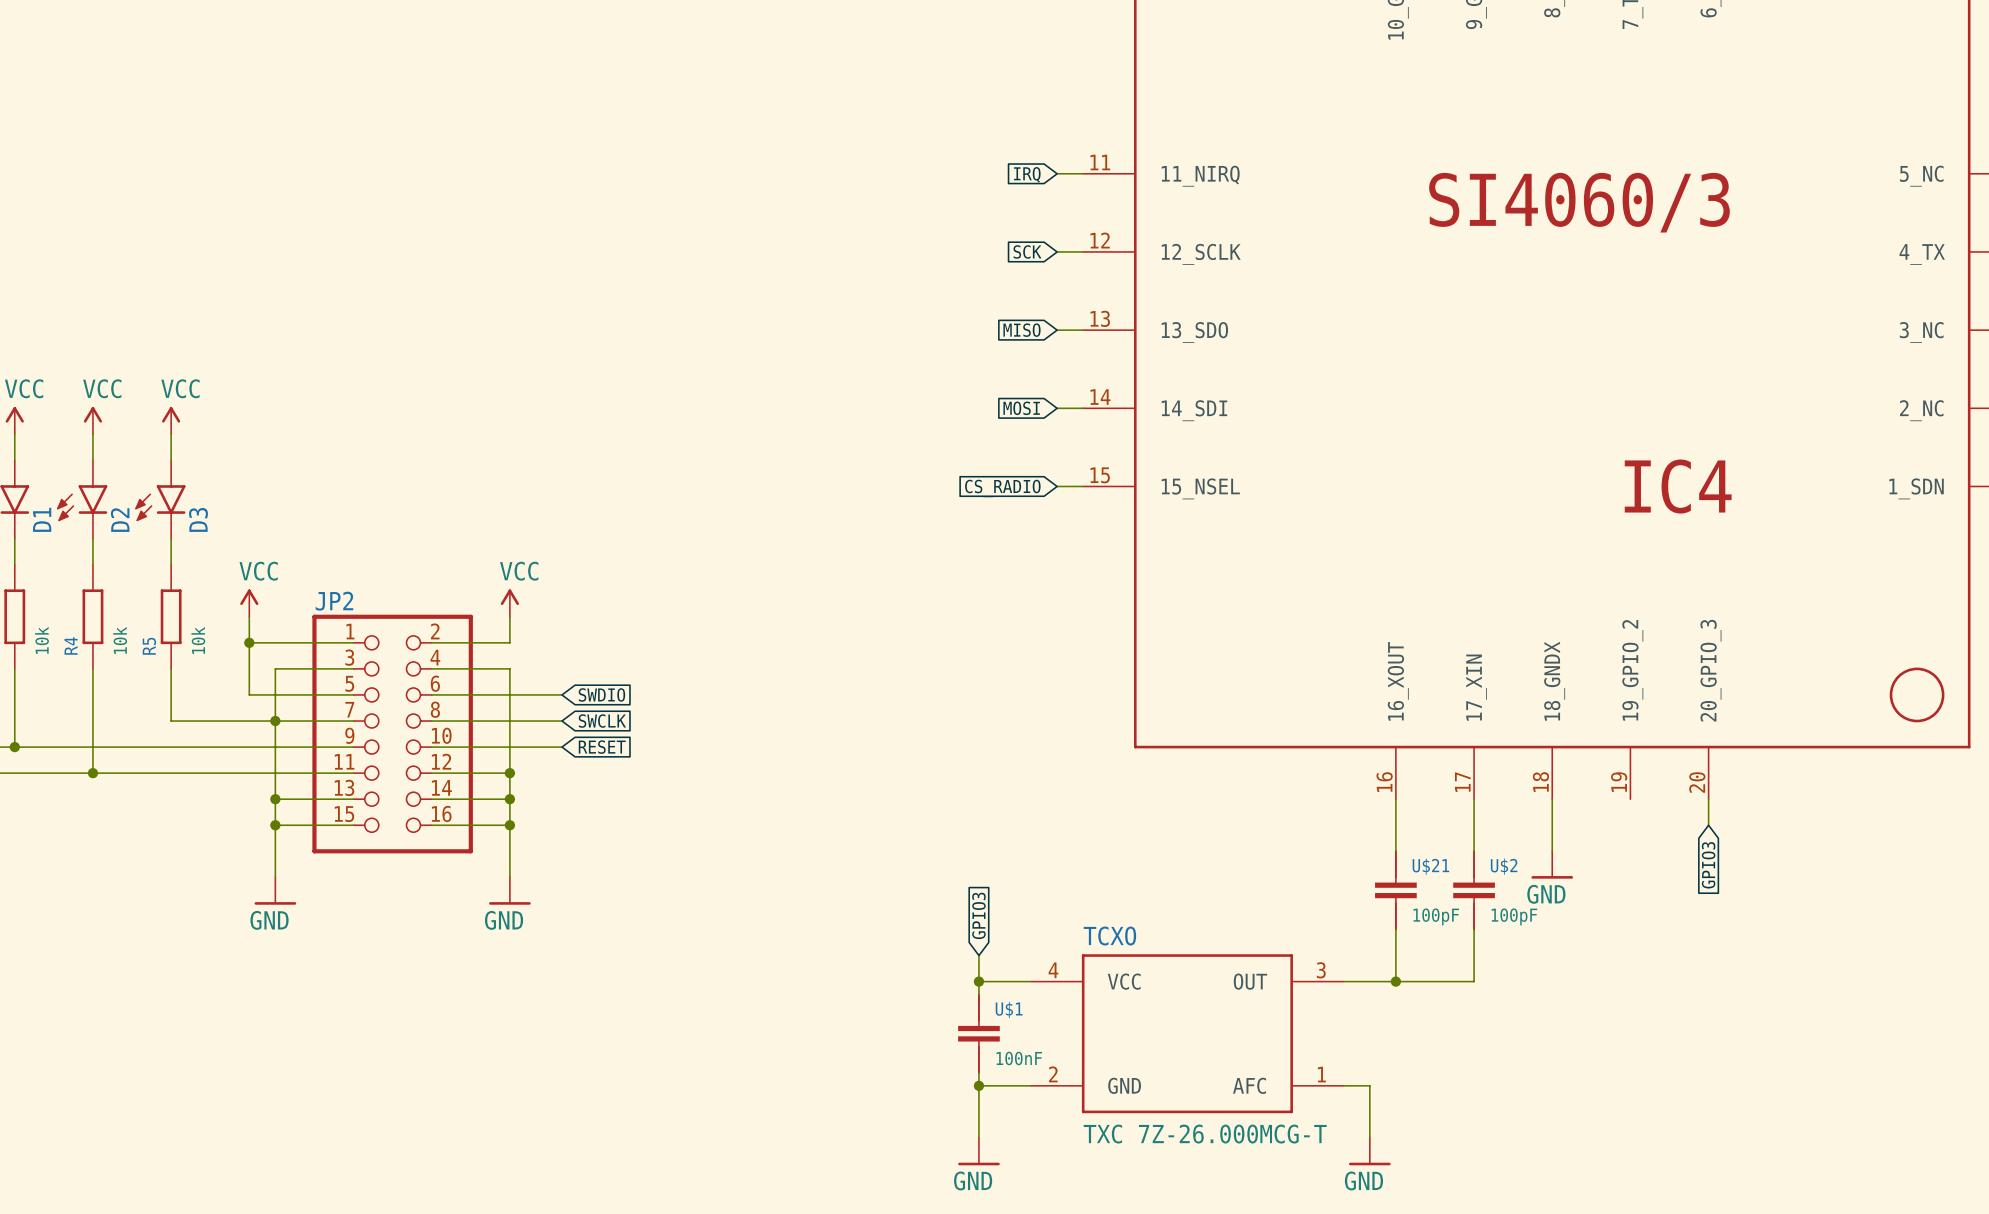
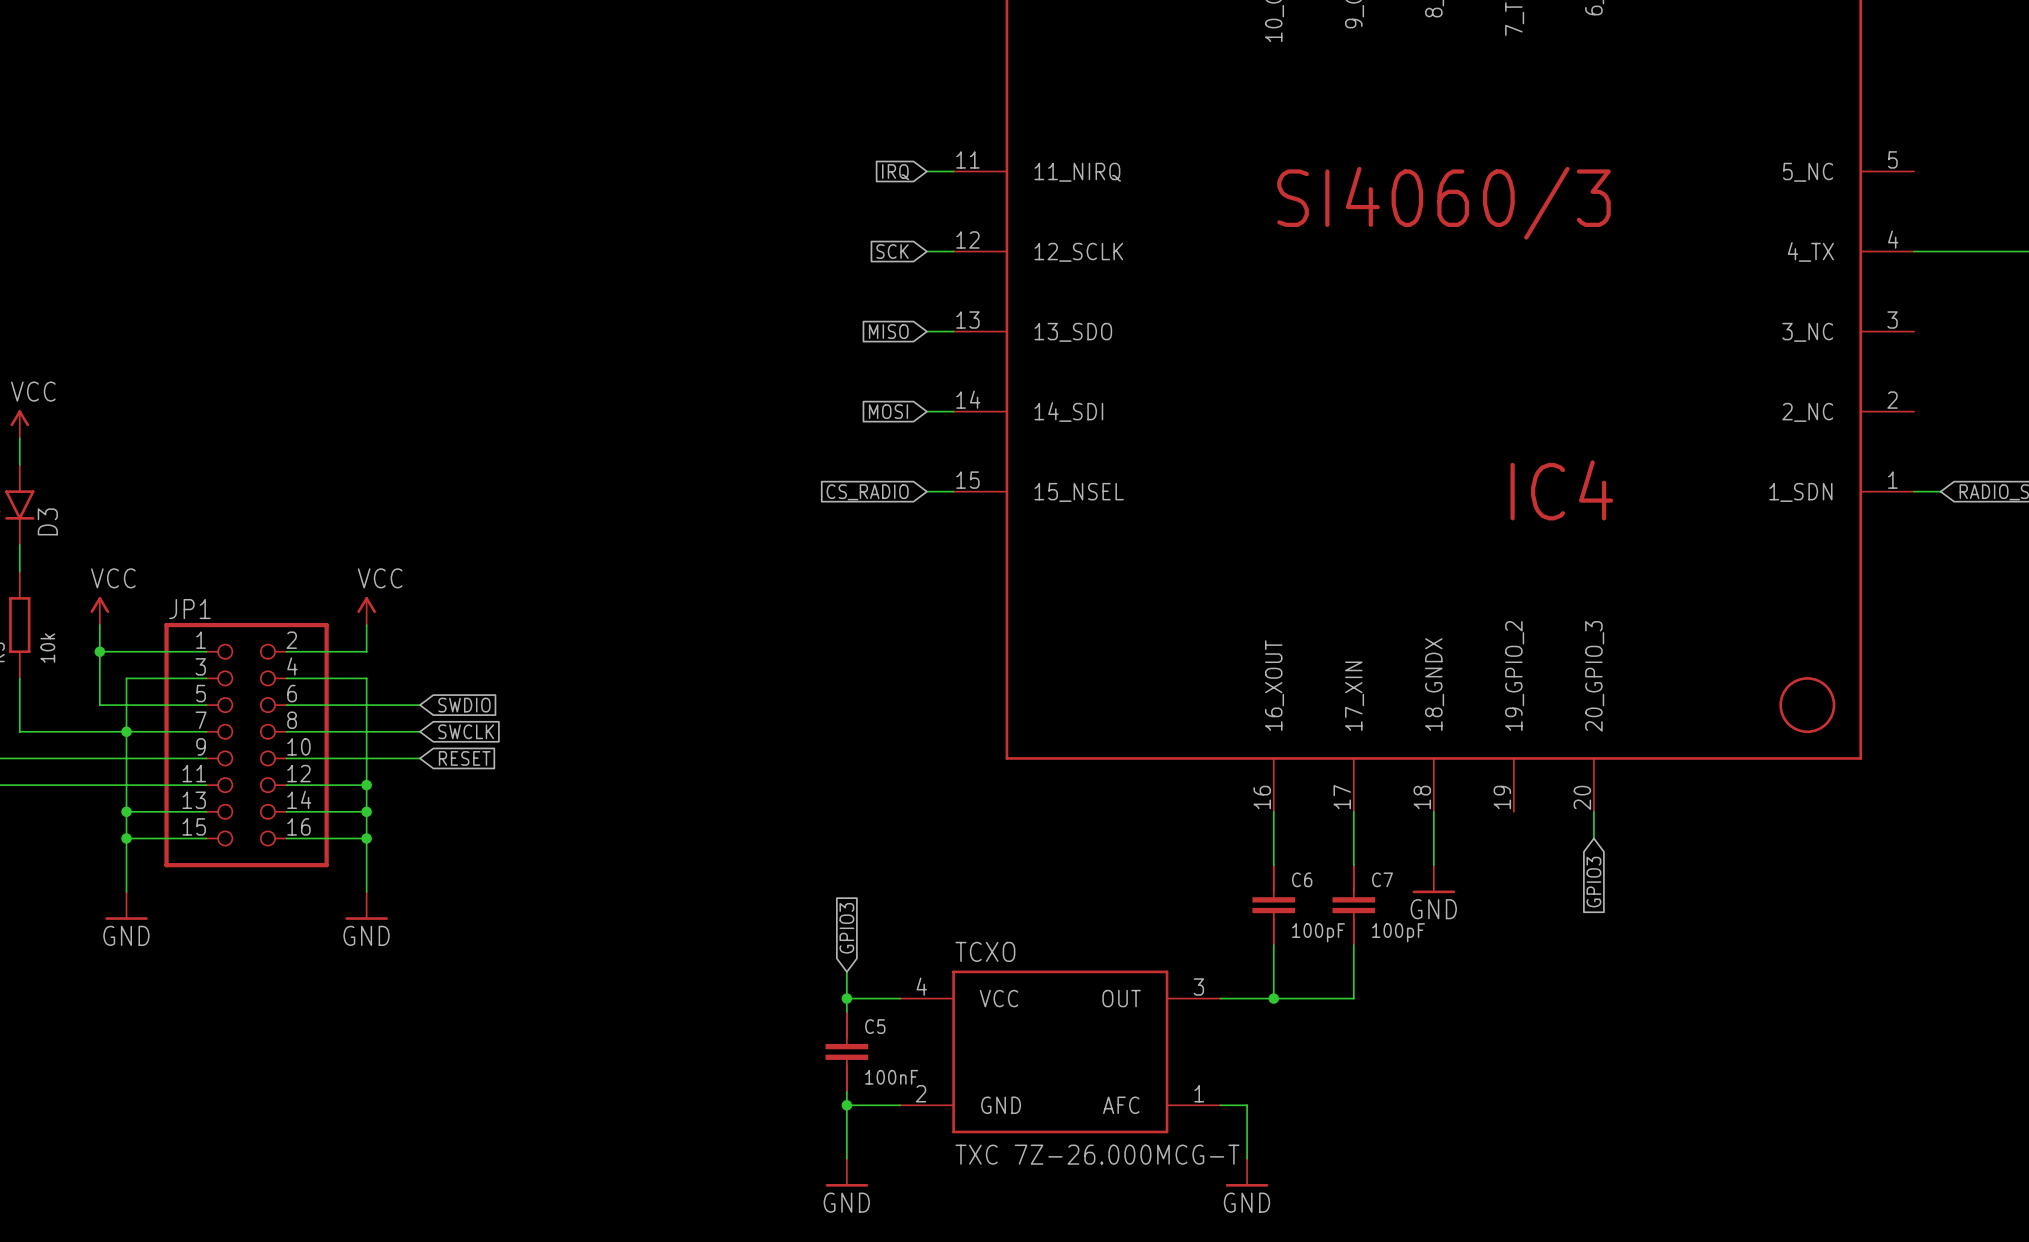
JP2 name: JP2 (334, 601) -> JP1 (189, 609)
U$21 name: U$21 (1430, 866) -> C6 (1302, 879)
U$2 name: U$2 (1504, 866) -> C7 (1382, 879)
U$1 name: U$1 (1009, 1010) -> C5 (875, 1026)

